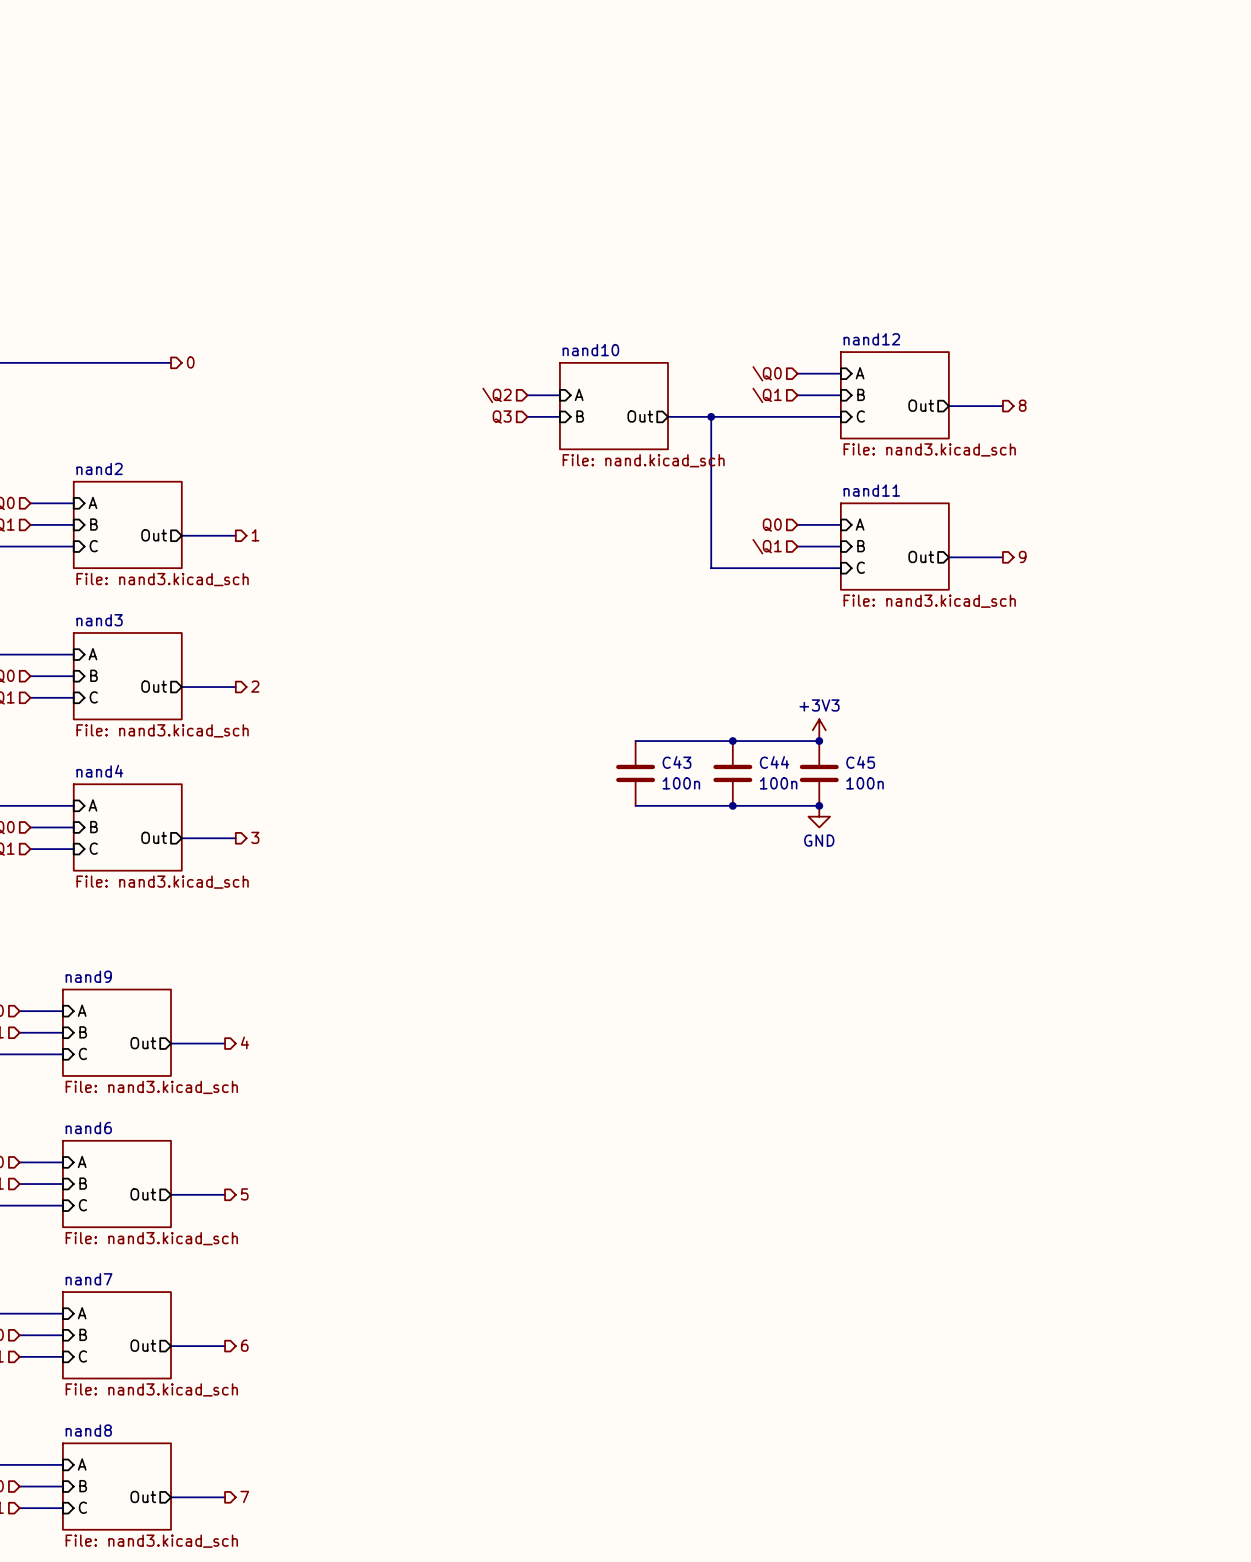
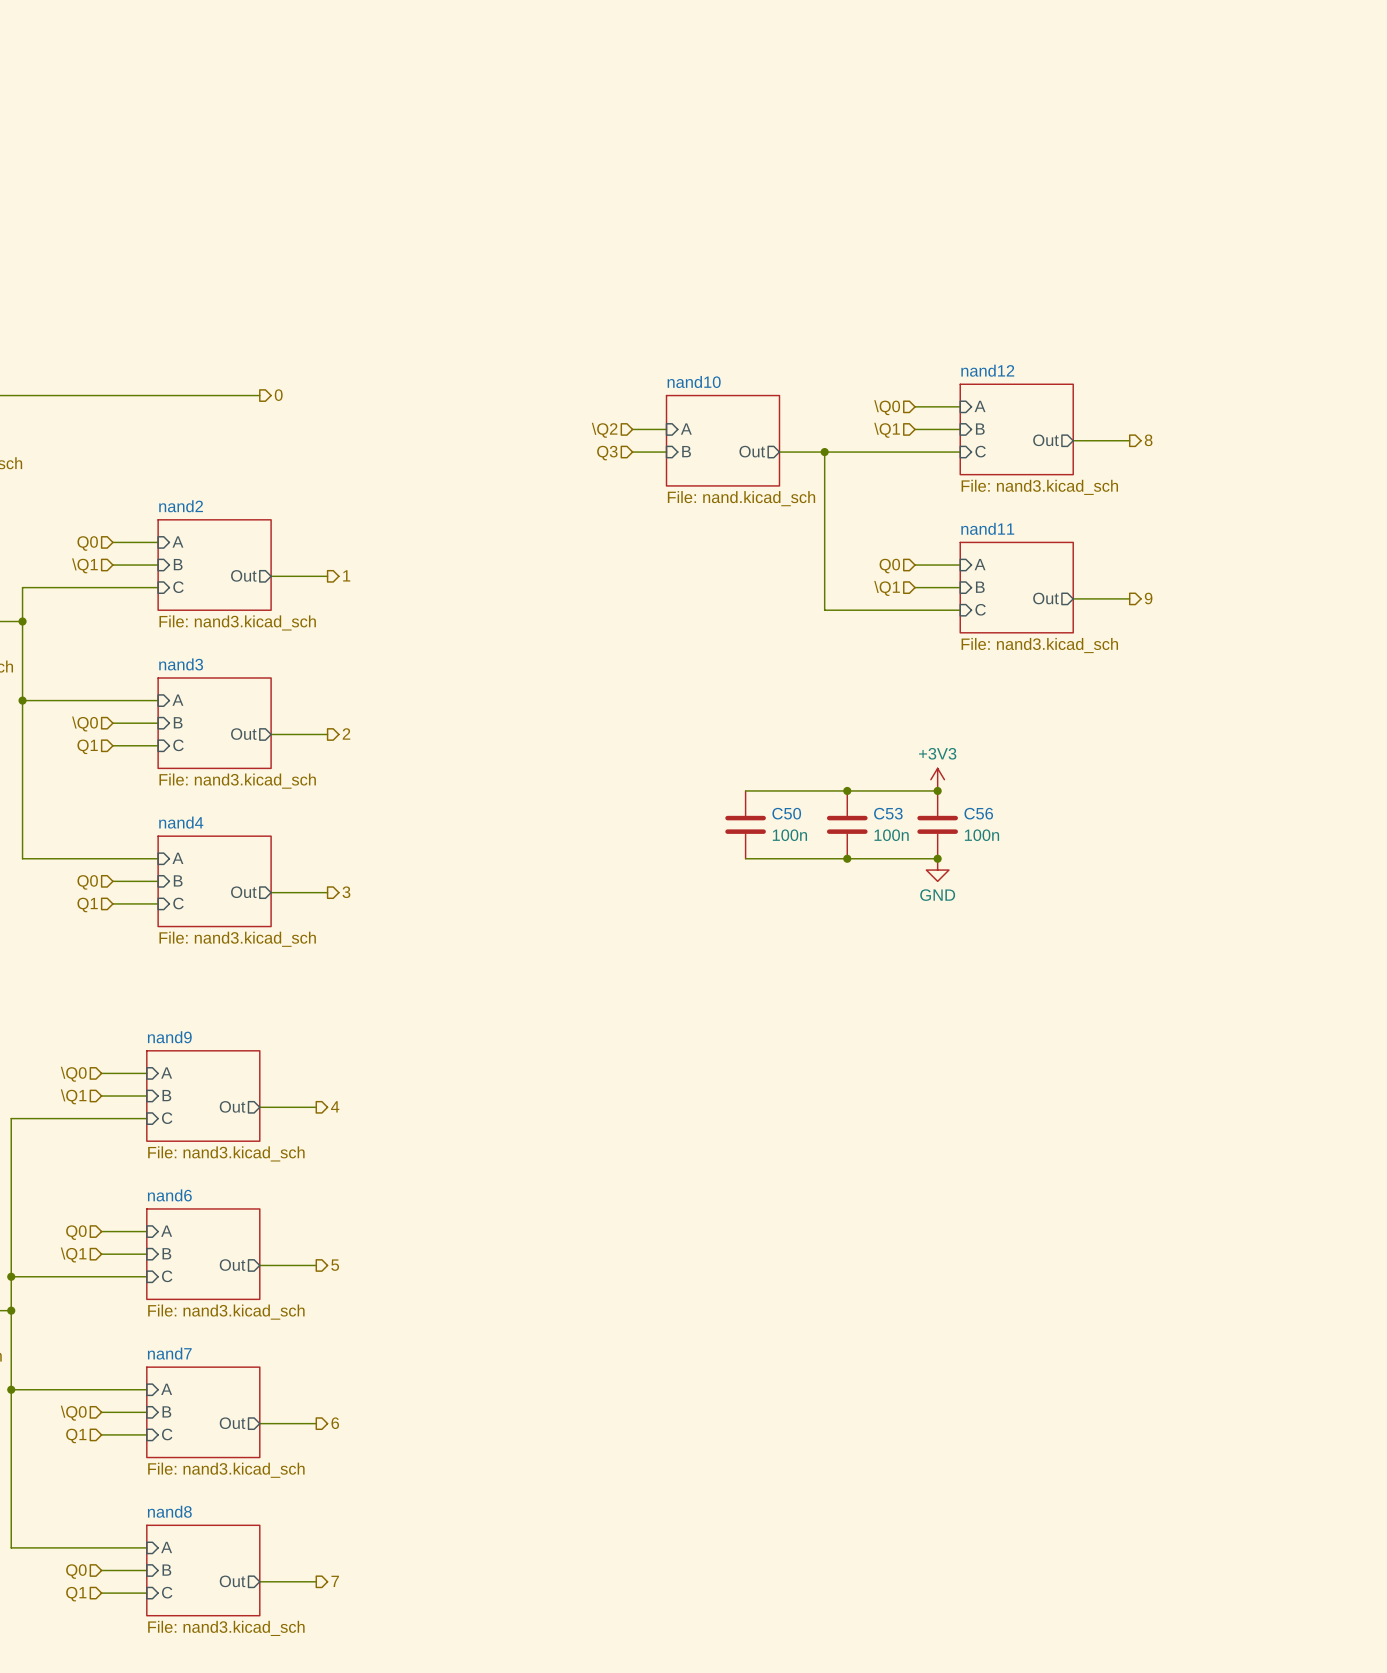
C43 name: C43 (676, 762) -> C50 (786, 813)
C44 name: C44 (774, 762) -> C53 (888, 813)
C45 name: C45 (860, 762) -> C56 (978, 813)

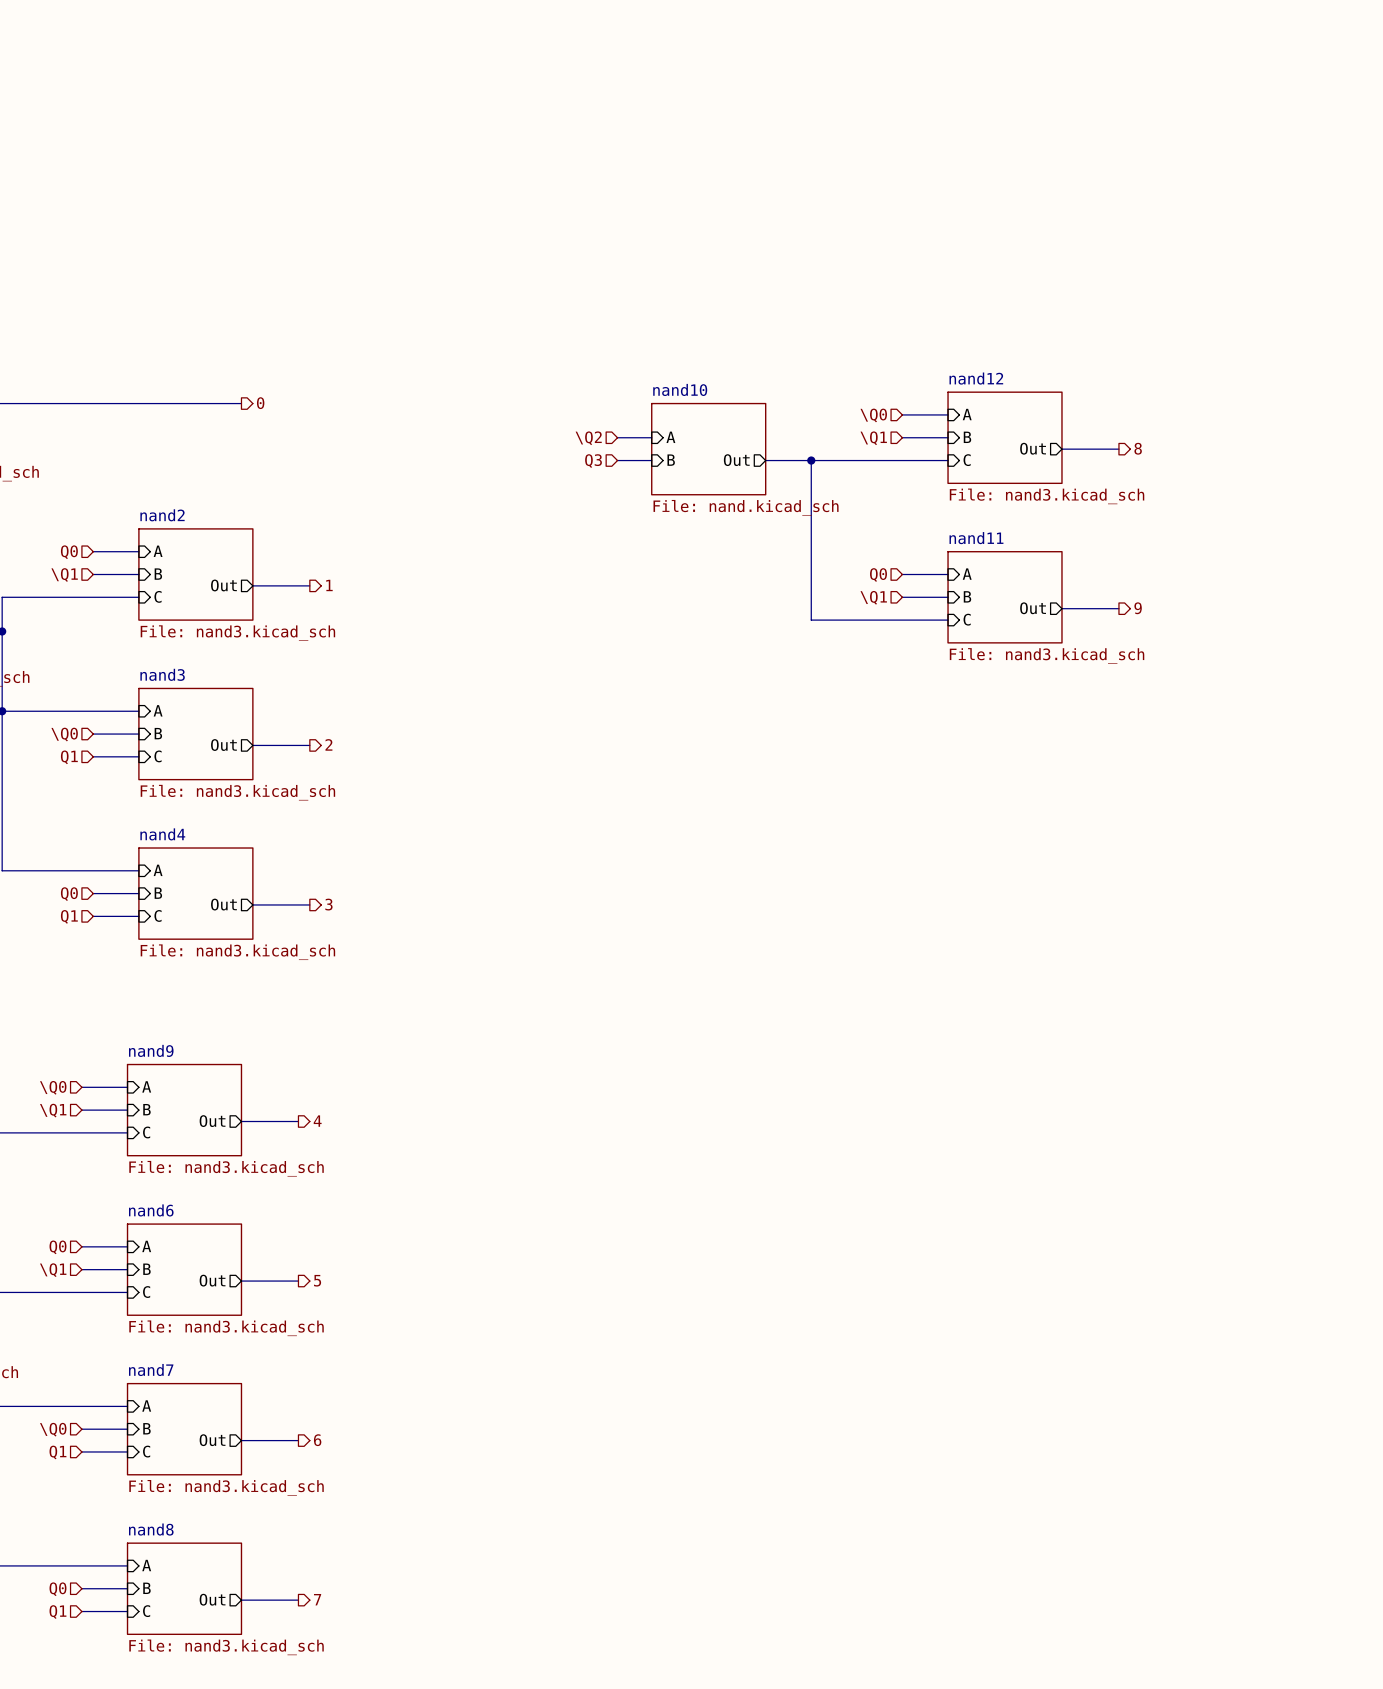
power symbol: +3V3 (937, 779) -> none
wire: (745, 790) (937, 790) -> none
junction: (847, 790) -> none
junction: (937, 790) -> none
C50: 100n (745, 824) -> none
C53: 100n (847, 824) -> none
C56: 100n (937, 824) -> none
wire: (745, 858) (937, 858) -> none
junction: (847, 858) -> none
junction: (937, 858) -> none
power symbol: GND (937, 870) -> none

